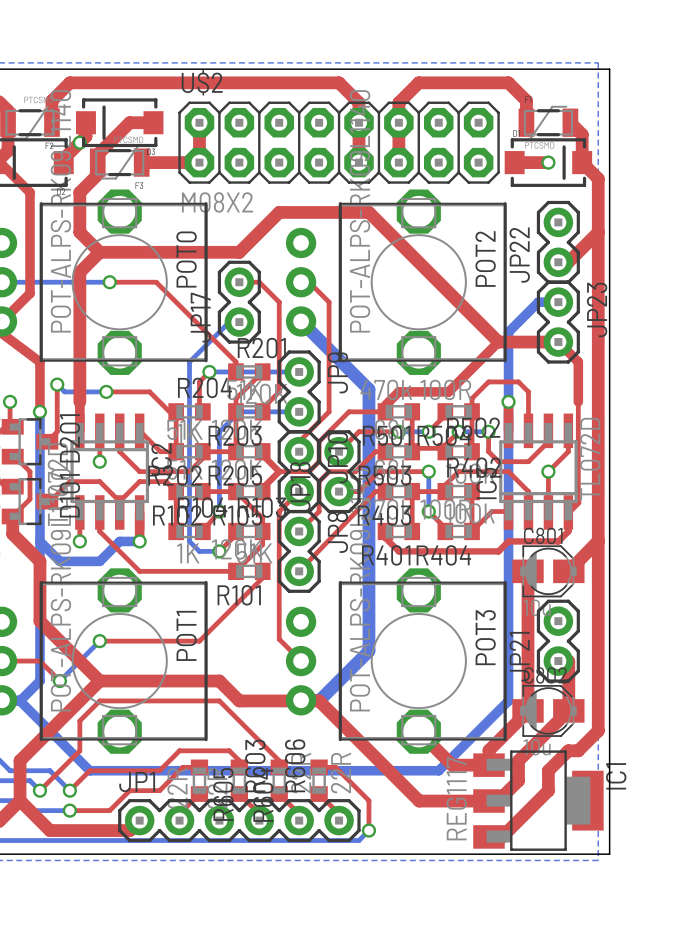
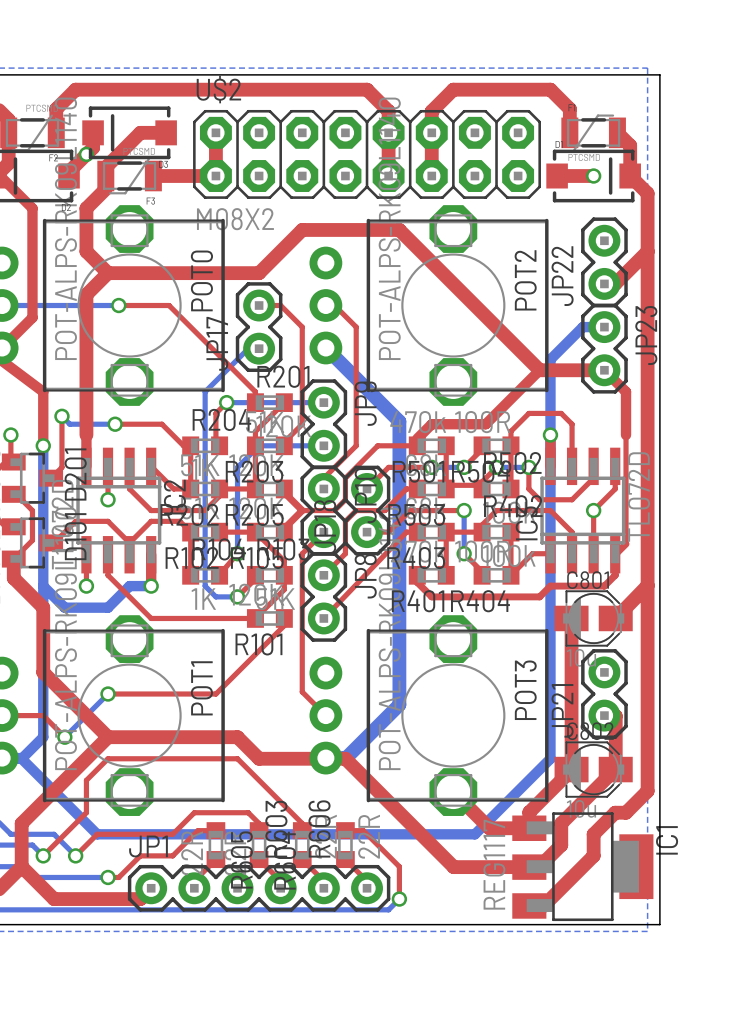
top track: (69, 810) (99, 810) -> none
bottom track: none -> (75, 877) (108, 877)
via position: (69, 810) -> (108, 877)

